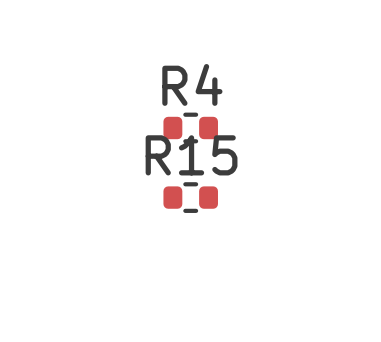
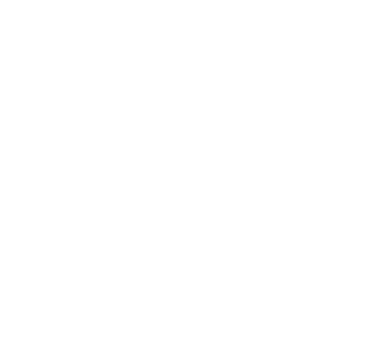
R4: (190, 127) -> none
R15: (190, 197) -> none

